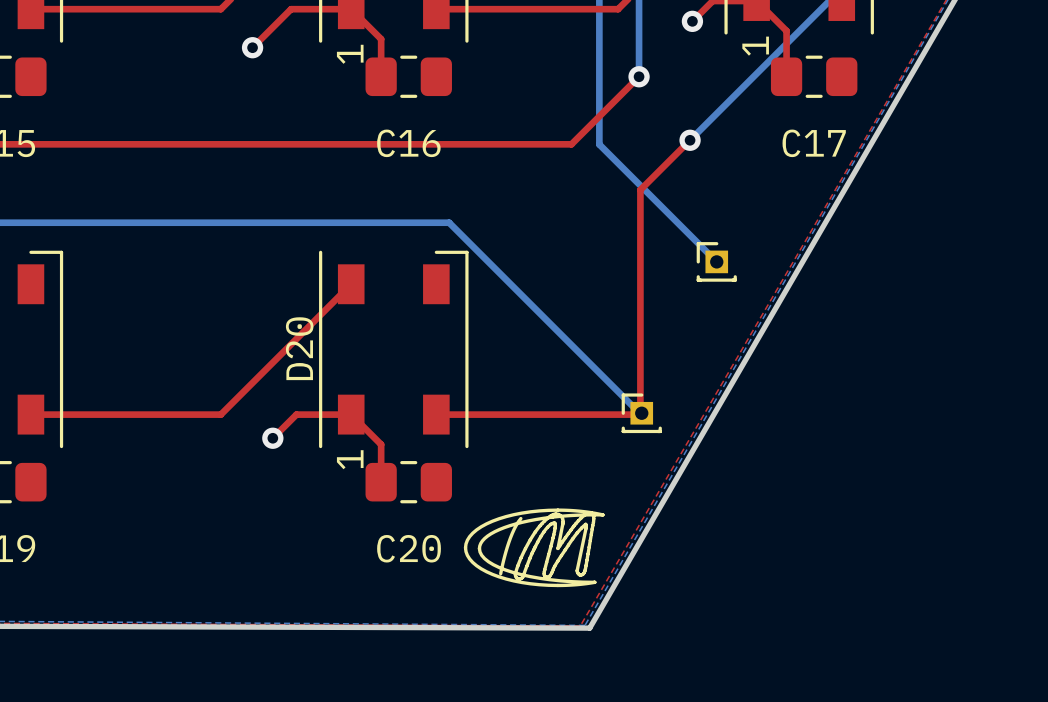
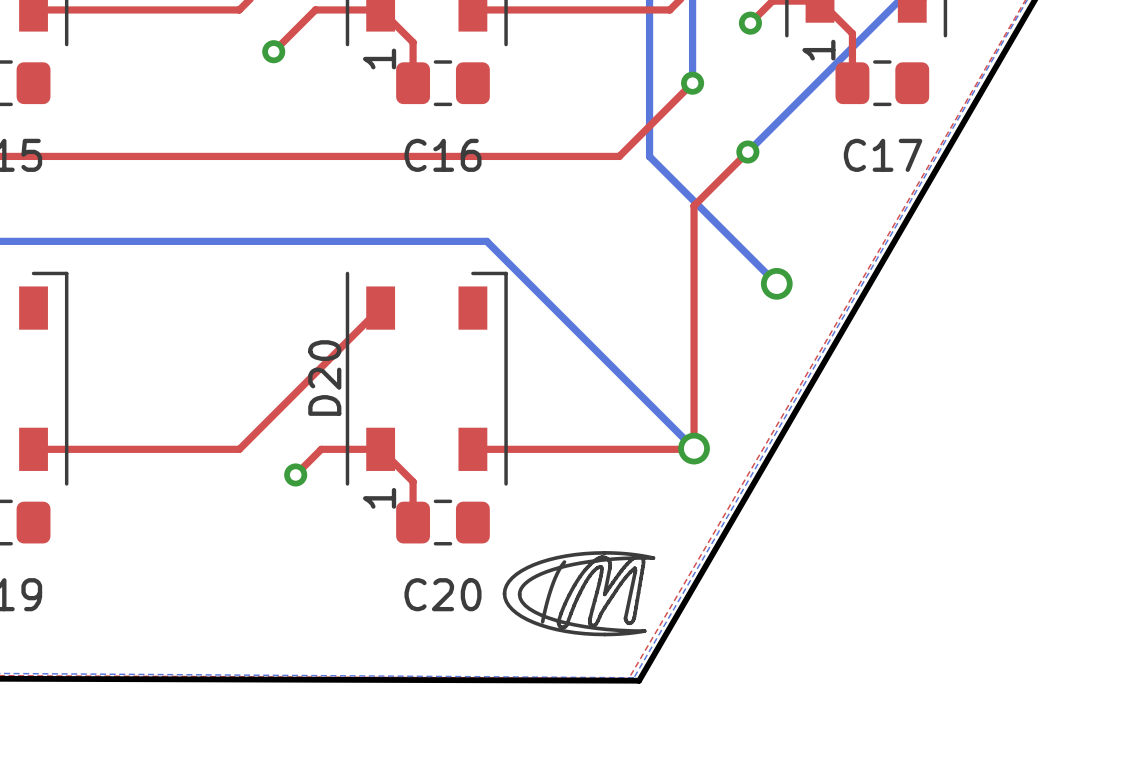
part: (716, 261) -> none
via: none -> (776, 283)
via: none -> (694, 448)
part: (641, 413) -> none

